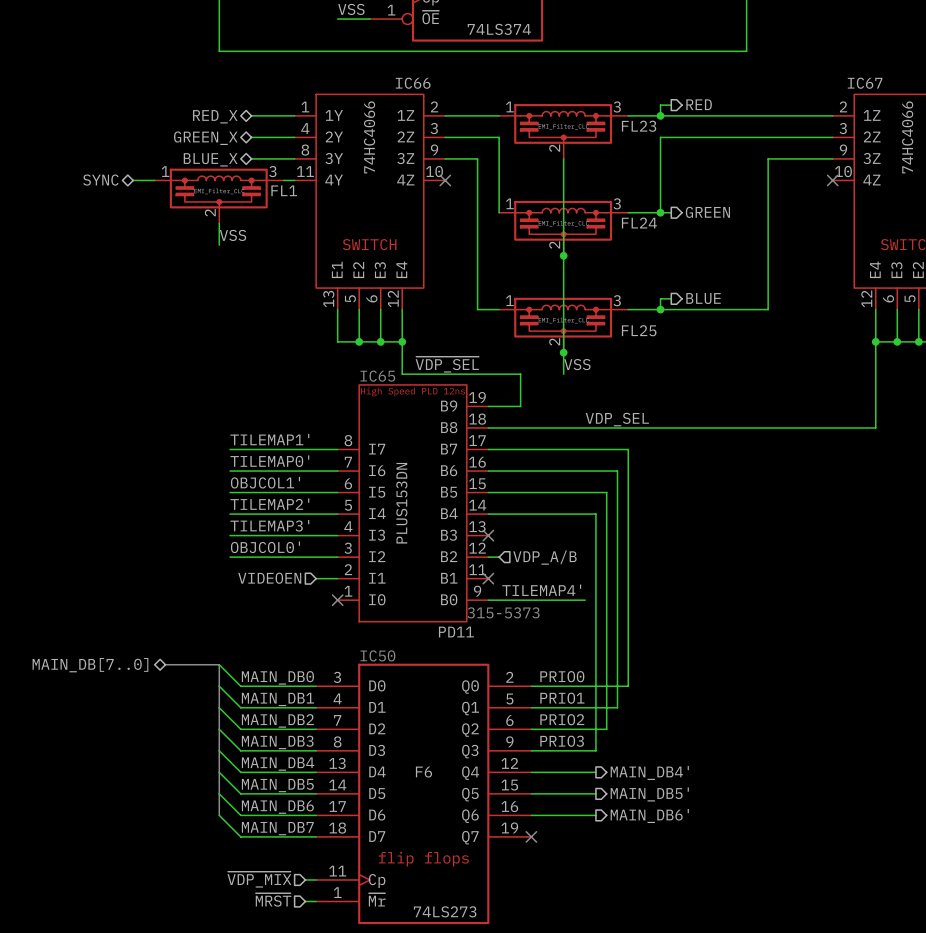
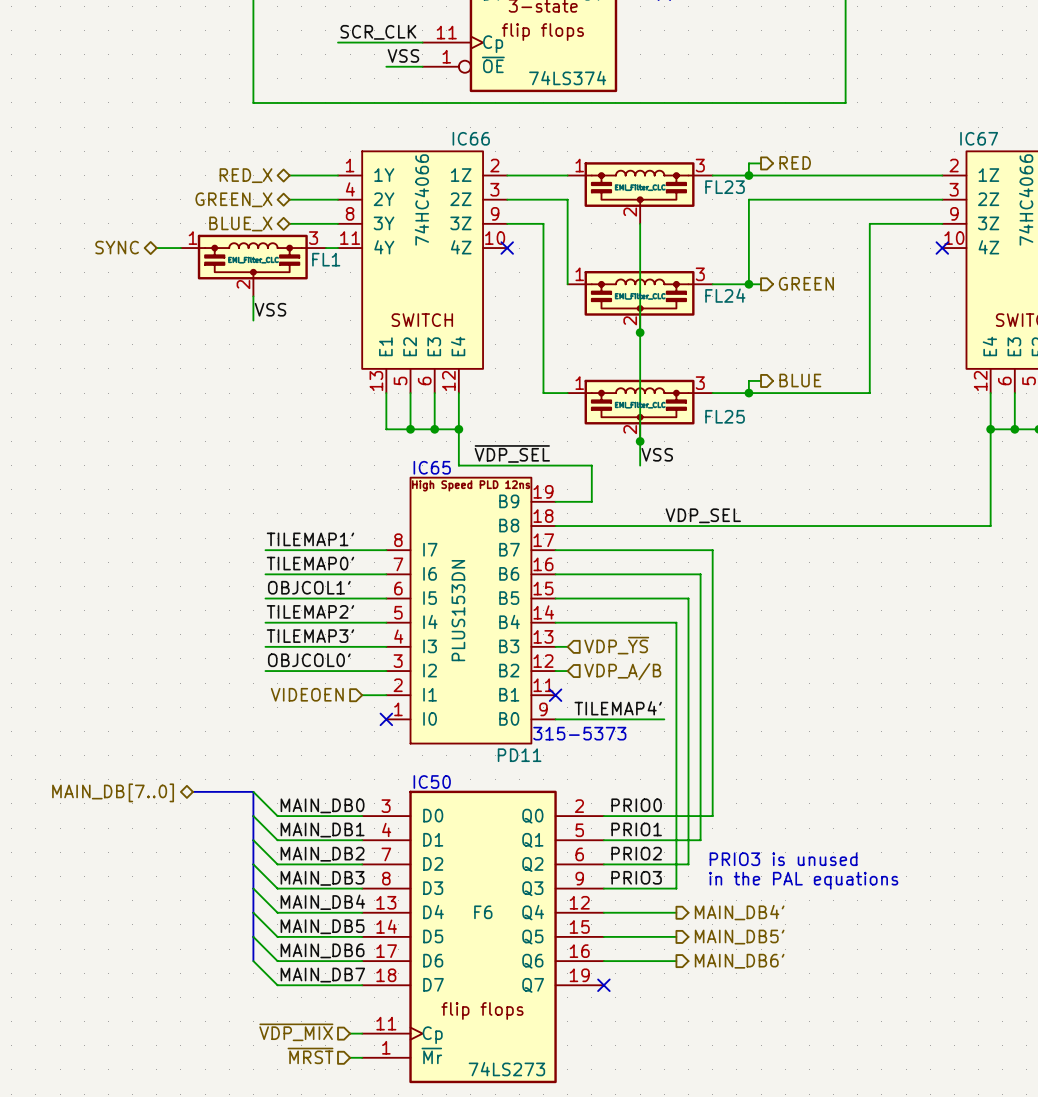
wire: none -> (555, 646) (567, 646)
no-connect mark: (488, 535) -> none
hierarchical label: none -> VDP_~{YS} (616, 645)
text: none -> PRIO3 is unused (783, 859)
text: none -> in the PAL equations (803, 880)

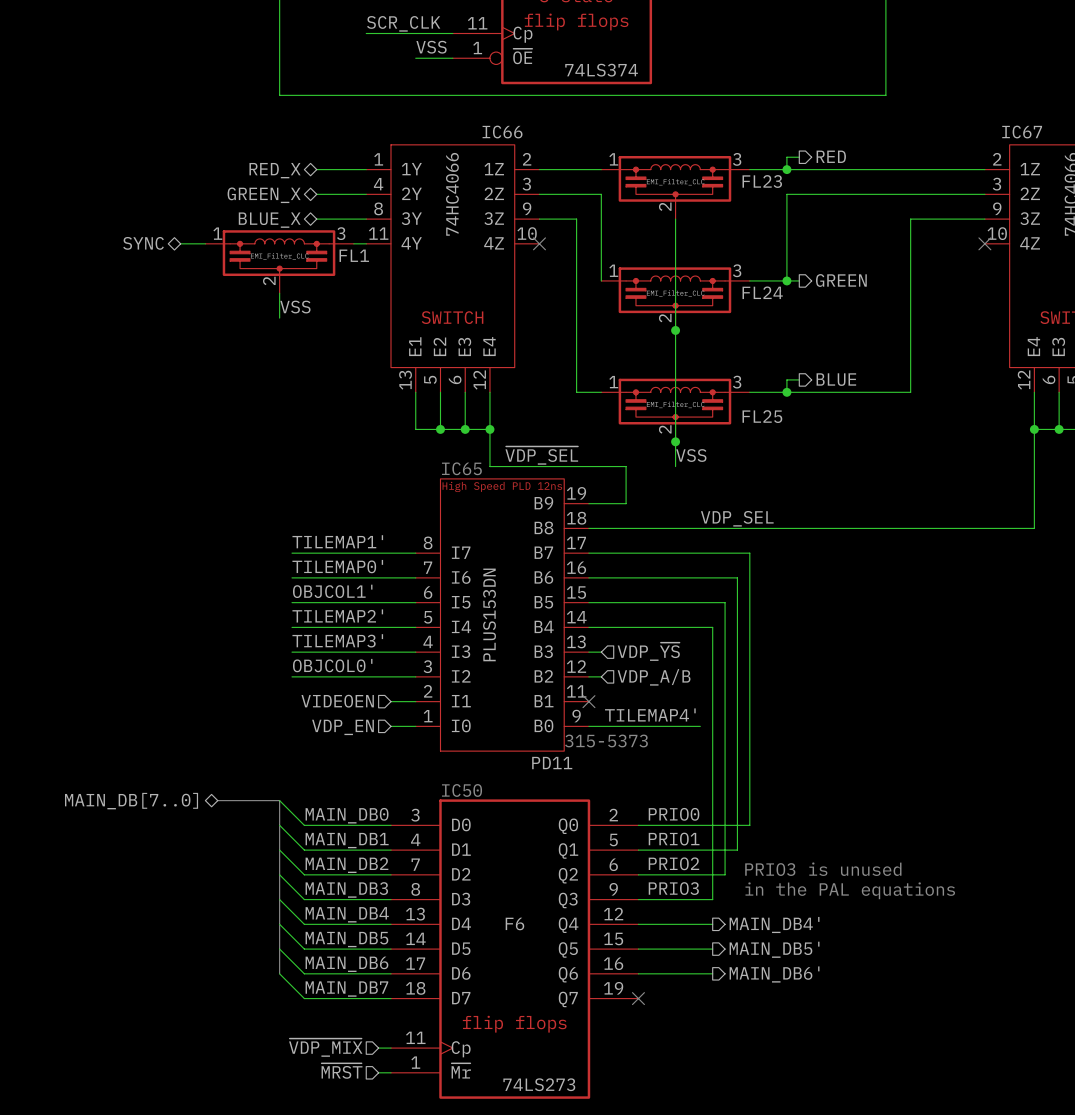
hierarchical label: none -> VDP_EN (342, 727)
wire: none -> (391, 726) (415, 726)
no-connect mark: (386, 719) -> none

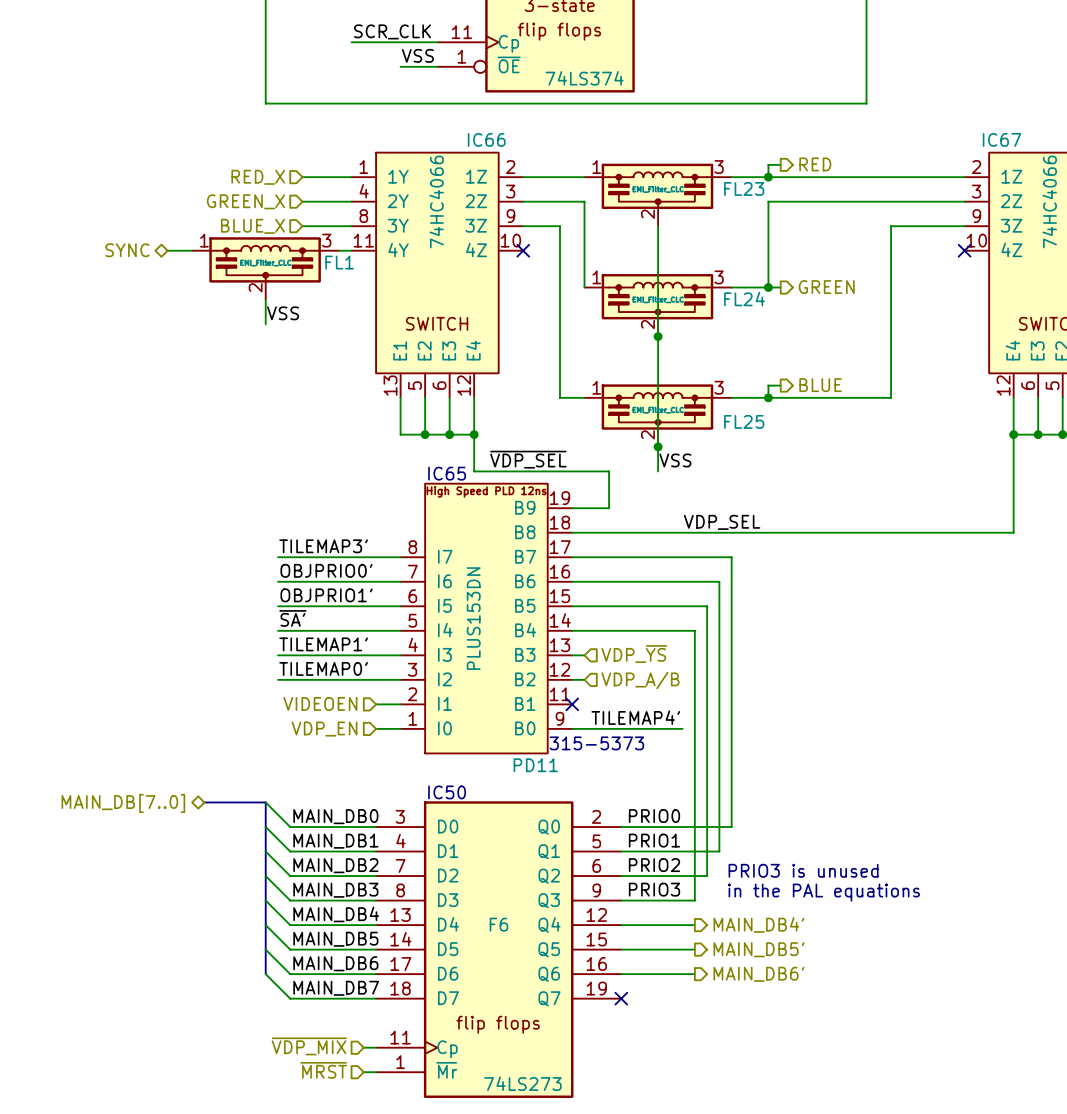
hierarchical label shape: bidirectional (275, 170) -> input (258, 177)
hierarchical label shape: bidirectional (264, 195) -> input (245, 201)
hierarchical label shape: bidirectional (269, 220) -> input (252, 226)
label: TILEMAP1' (337, 541) -> TILEMAP3' (323, 546)
label: TILEMAP0' (337, 566) -> OBJPRIO0' (326, 570)
label: OBJCOL1' (332, 591) -> OBJPRIO1' (326, 595)
label: TILEMAP2' (337, 615) -> ~{SA'} (292, 618)
label: TILEMAP3' (337, 640) -> TILEMAP1' (323, 644)
label: OBJCOL0' (332, 665) -> TILEMAP0' (323, 668)

